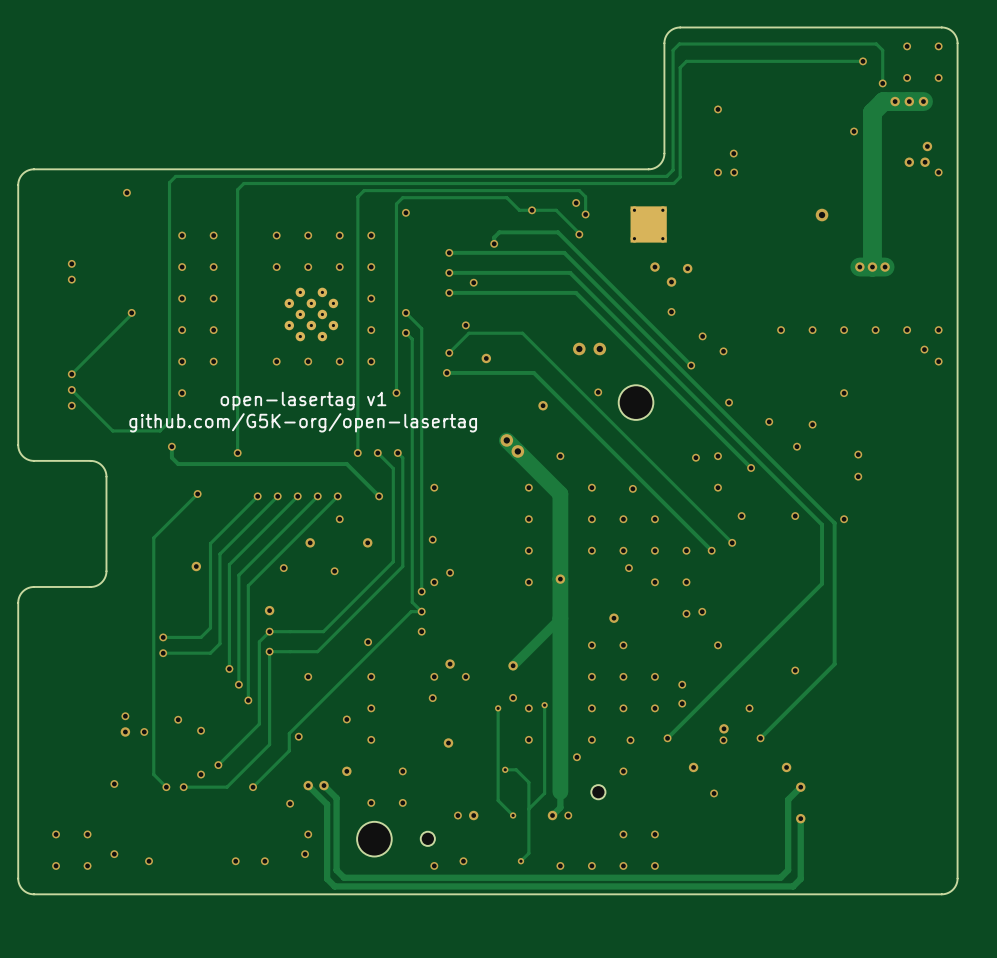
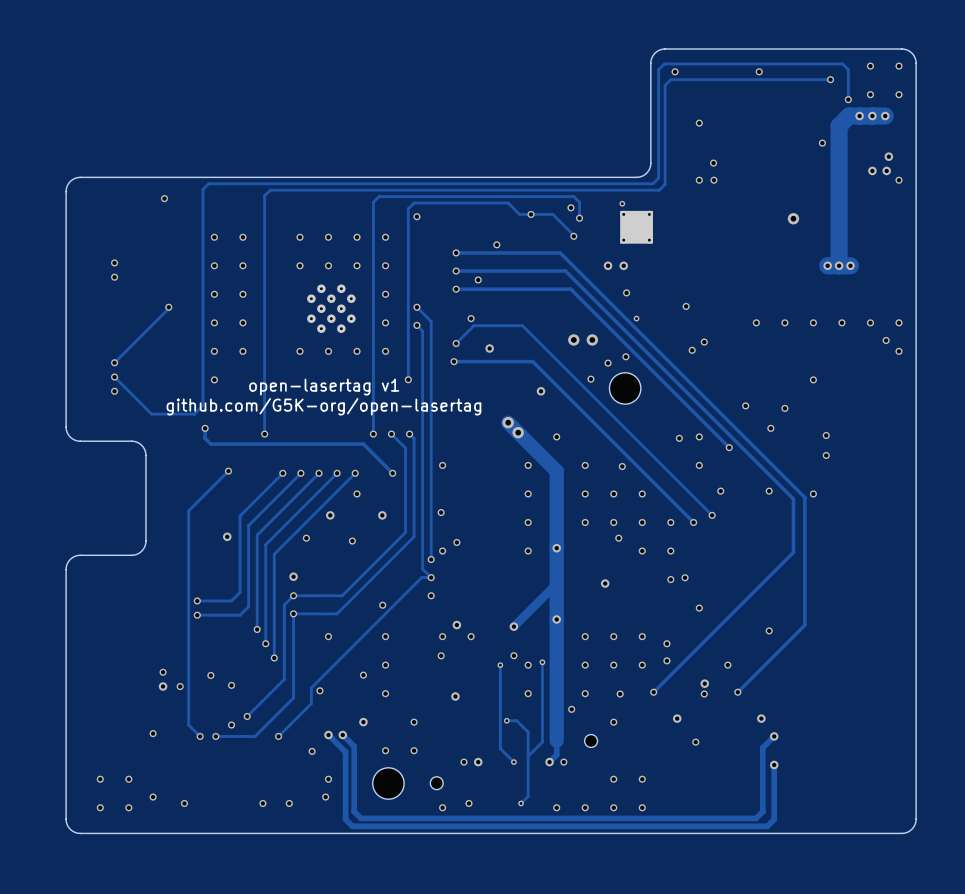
via: none -> (675, 71)
via: none -> (759, 71)
via: none -> (622, 203)
track: (494, 243) (494, 237) (499, 232) (558, 232) (691, 365) -> none
via: none -> (608, 265)
via: none -> (623, 265)
via: (654, 267) -> none
via: (687, 268) -> none
via: (671, 282) -> none
via: none -> (626, 292)
via: (671, 311) -> none
via: none -> (686, 306)
via: none -> (636, 318)
via: (702, 336) -> none
via: none -> (692, 350)
via: (691, 365) -> none
via: none -> (625, 356)
via: none -> (608, 363)
via: (729, 402) -> none
via: (591, 645) -> none
via: (623, 645) -> none
via: none -> (556, 619)

